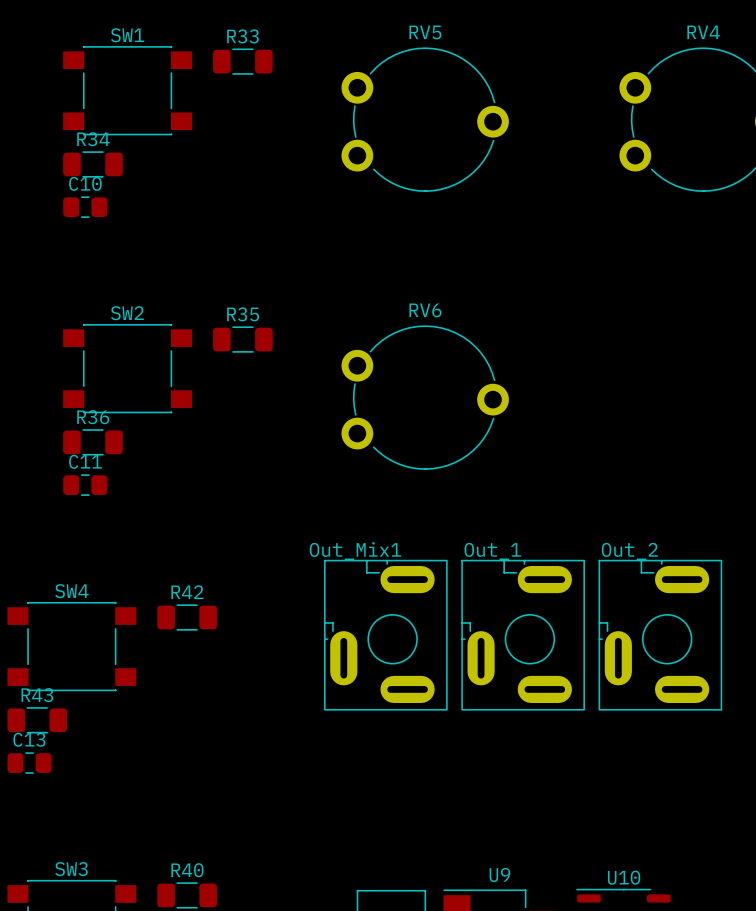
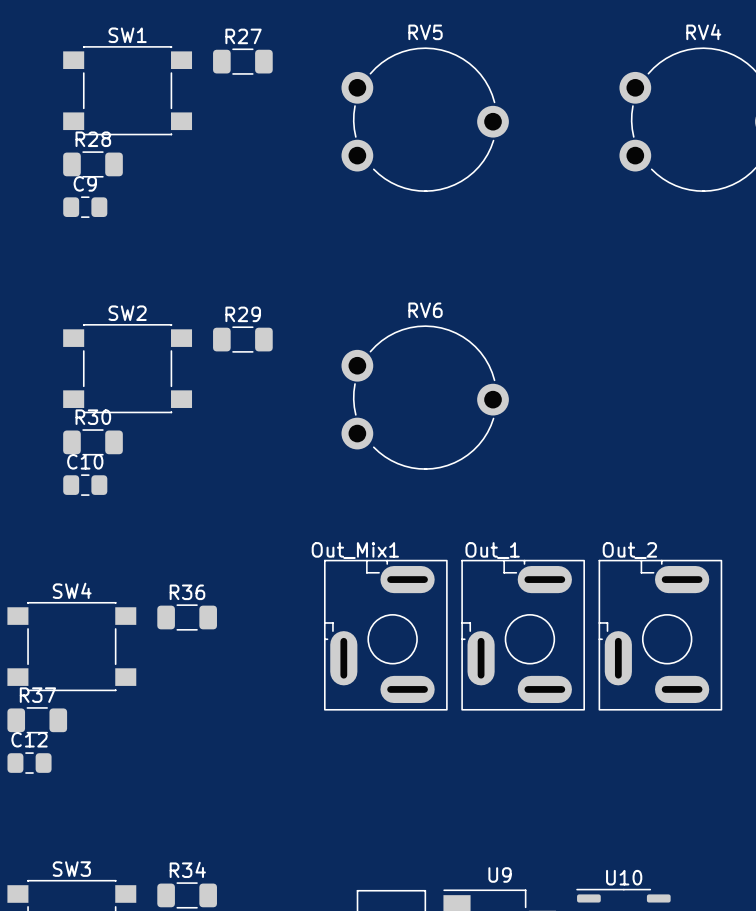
R33 name: R33 (242, 36) -> R27 (243, 36)
R34 name: R34 (93, 139) -> R28 (93, 139)
C10 name: C10 (85, 183) -> C9 (85, 183)
R35 name: R35 (243, 314) -> R29 (243, 314)
R36 name: R36 (93, 417) -> R30 (93, 417)
C11 name: C11 (85, 461) -> C10 (85, 461)
R42 name: R42 (187, 592) -> R36 (187, 592)
R43 name: R43 (37, 695) -> R37 (37, 695)
C13 name: C13 (29, 739) -> C12 (29, 739)
R40 name: R40 (187, 870) -> R34 (187, 869)

